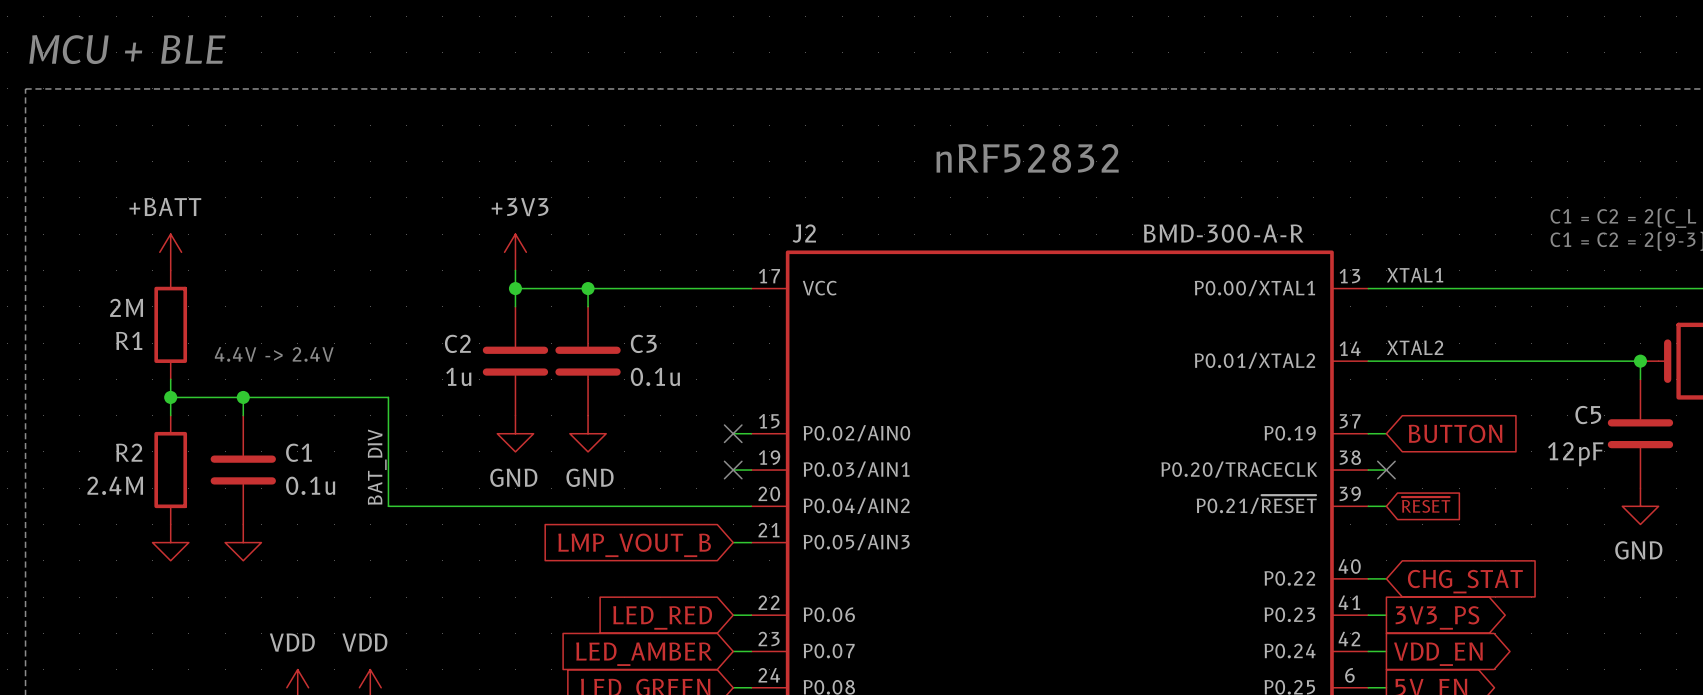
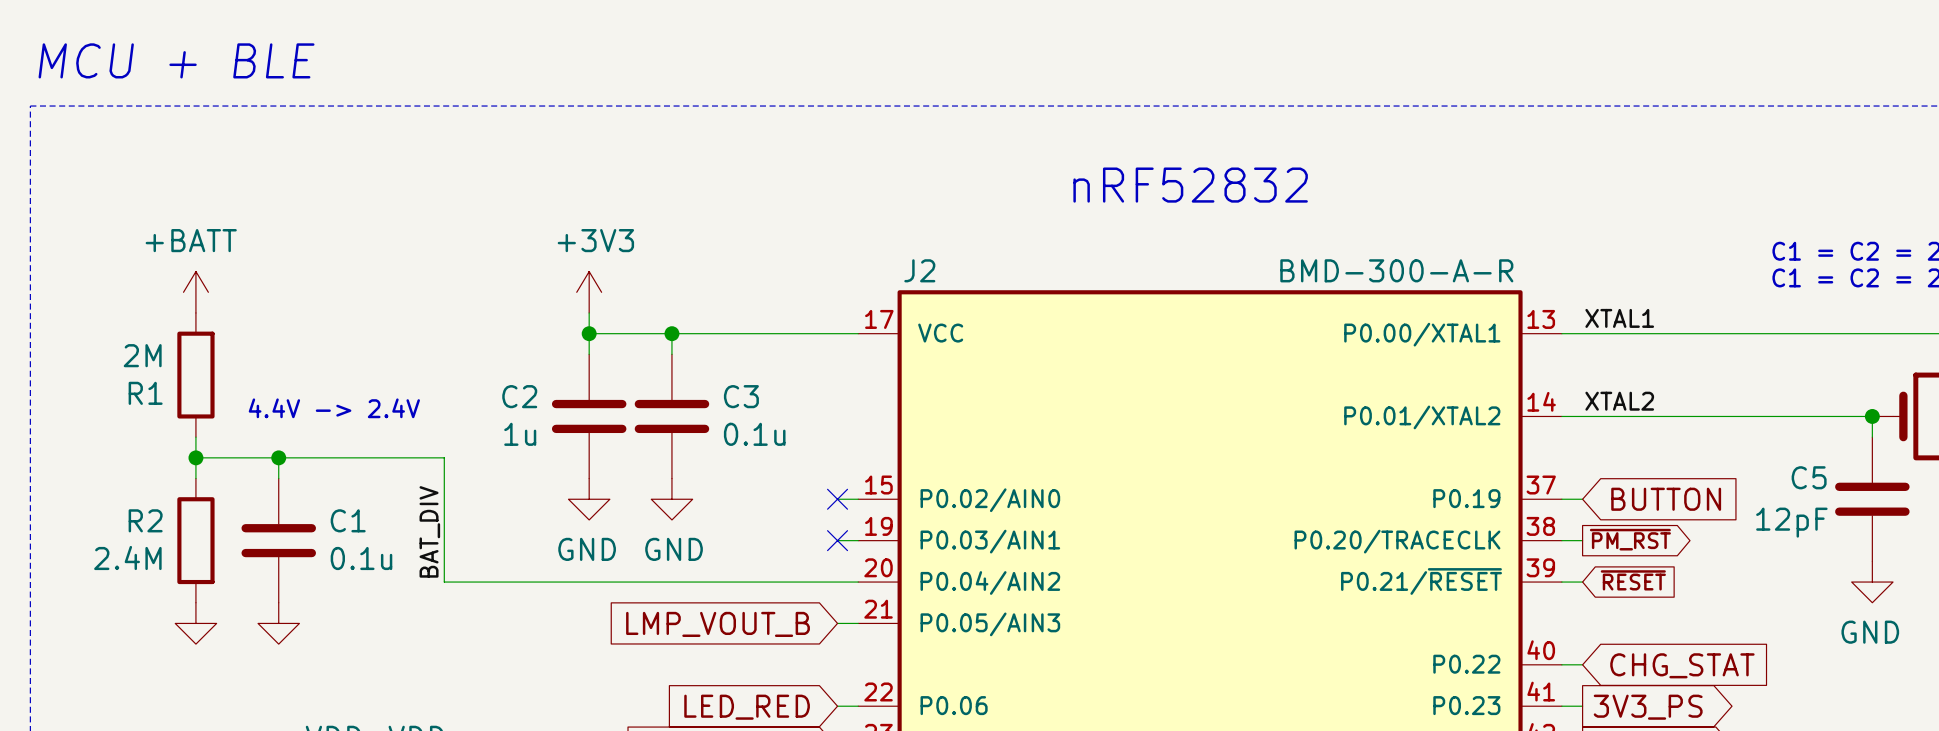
no-connect mark: (1386, 470) -> none
global label: none -> ~{PM_RST} (1630, 539)

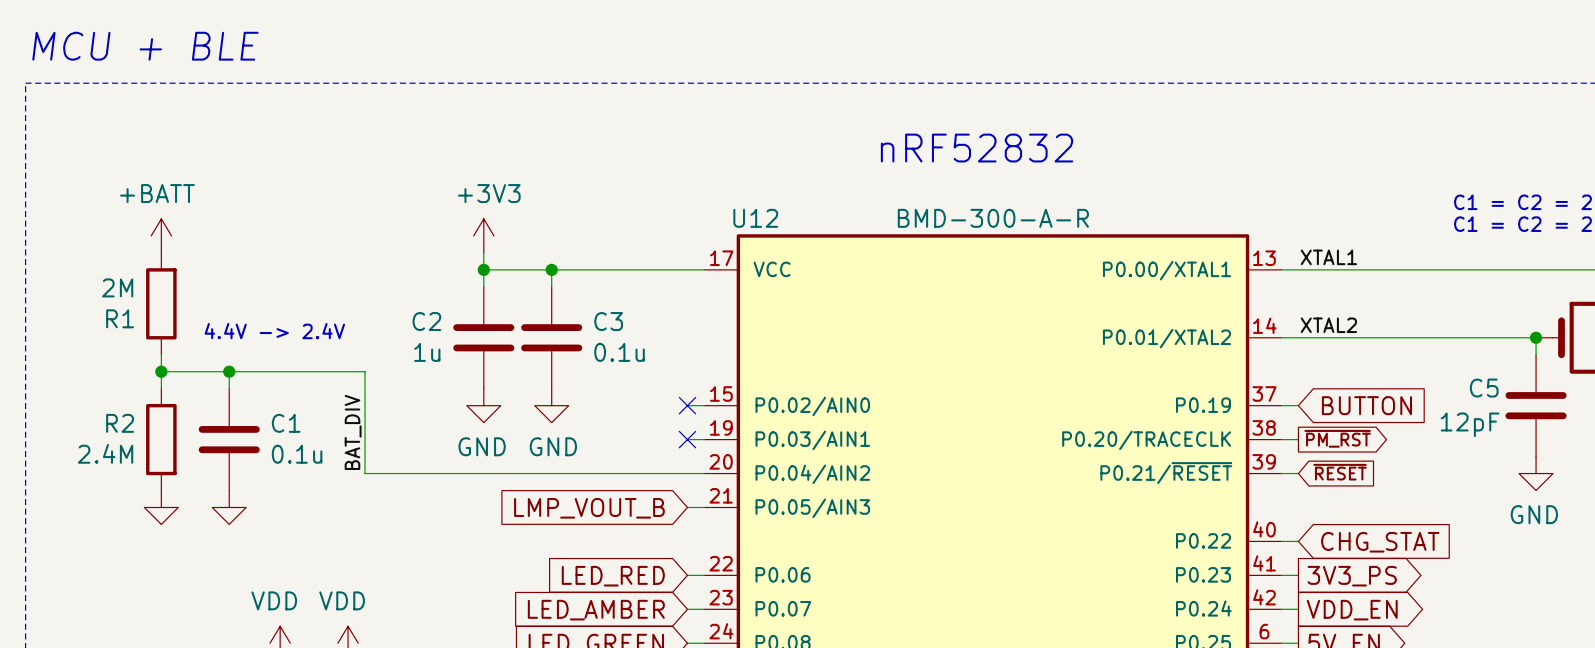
J2 name: J2 (919, 270) -> U12 (755, 218)
J2 value position: BMD-300-A-R (1396, 270) -> BMD-300-A-R (993, 218)

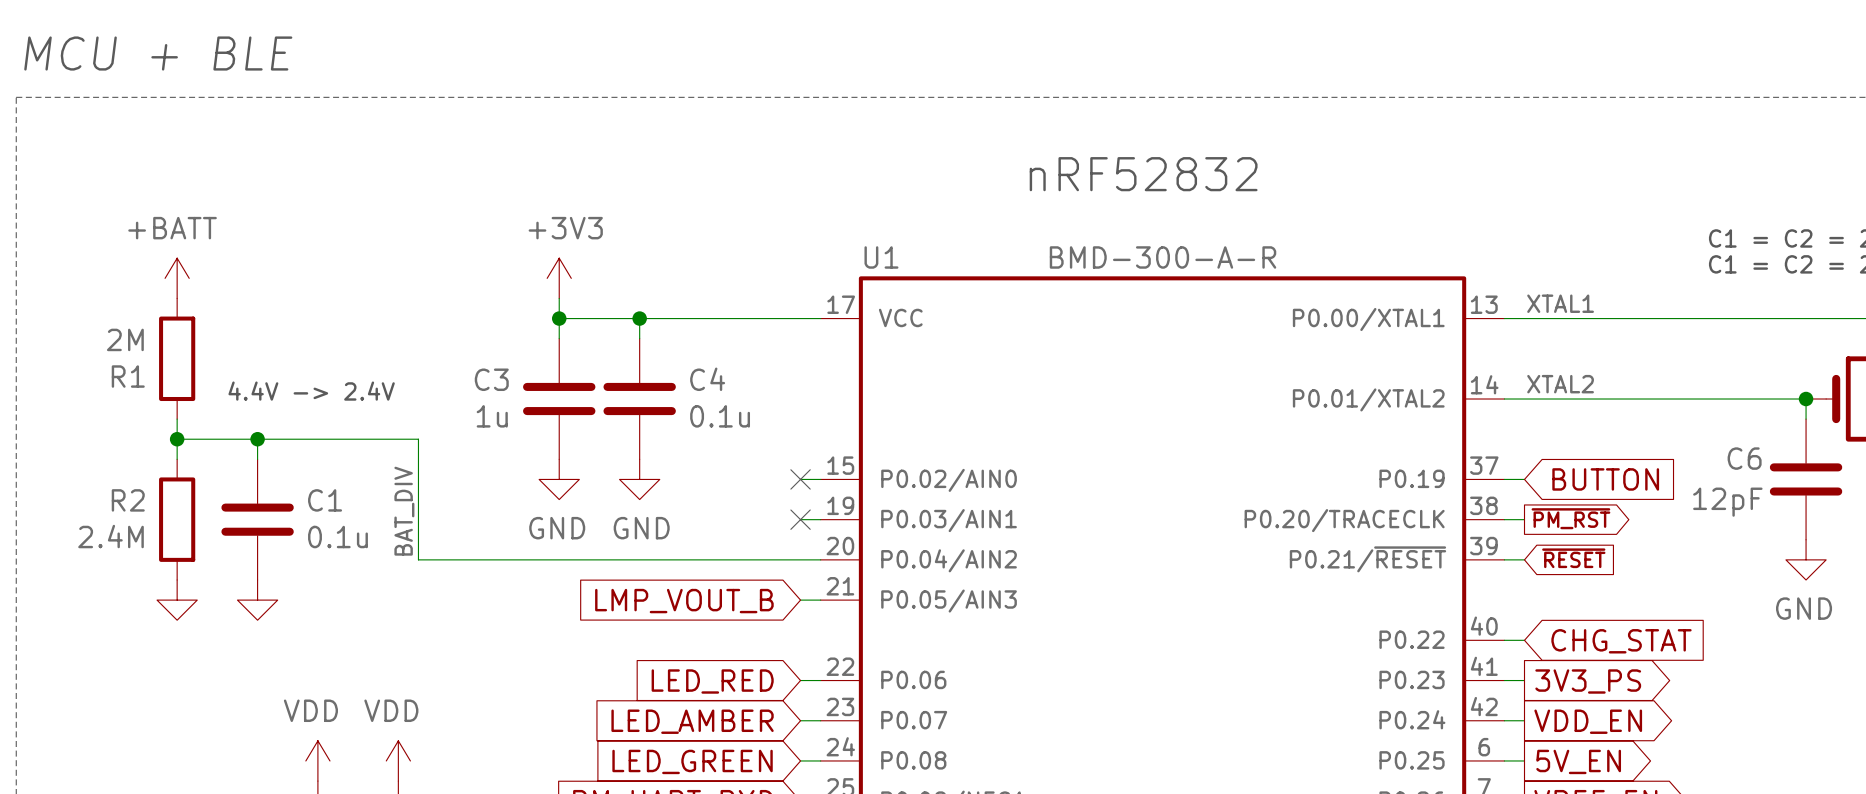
U12 name: U12 (755, 218) -> U1 (881, 257)
C2 name: C2 (426, 321) -> C3 (491, 379)
C3 name: C3 (608, 321) -> C4 (707, 379)
C5 name: C5 (1484, 388) -> C6 (1744, 458)

